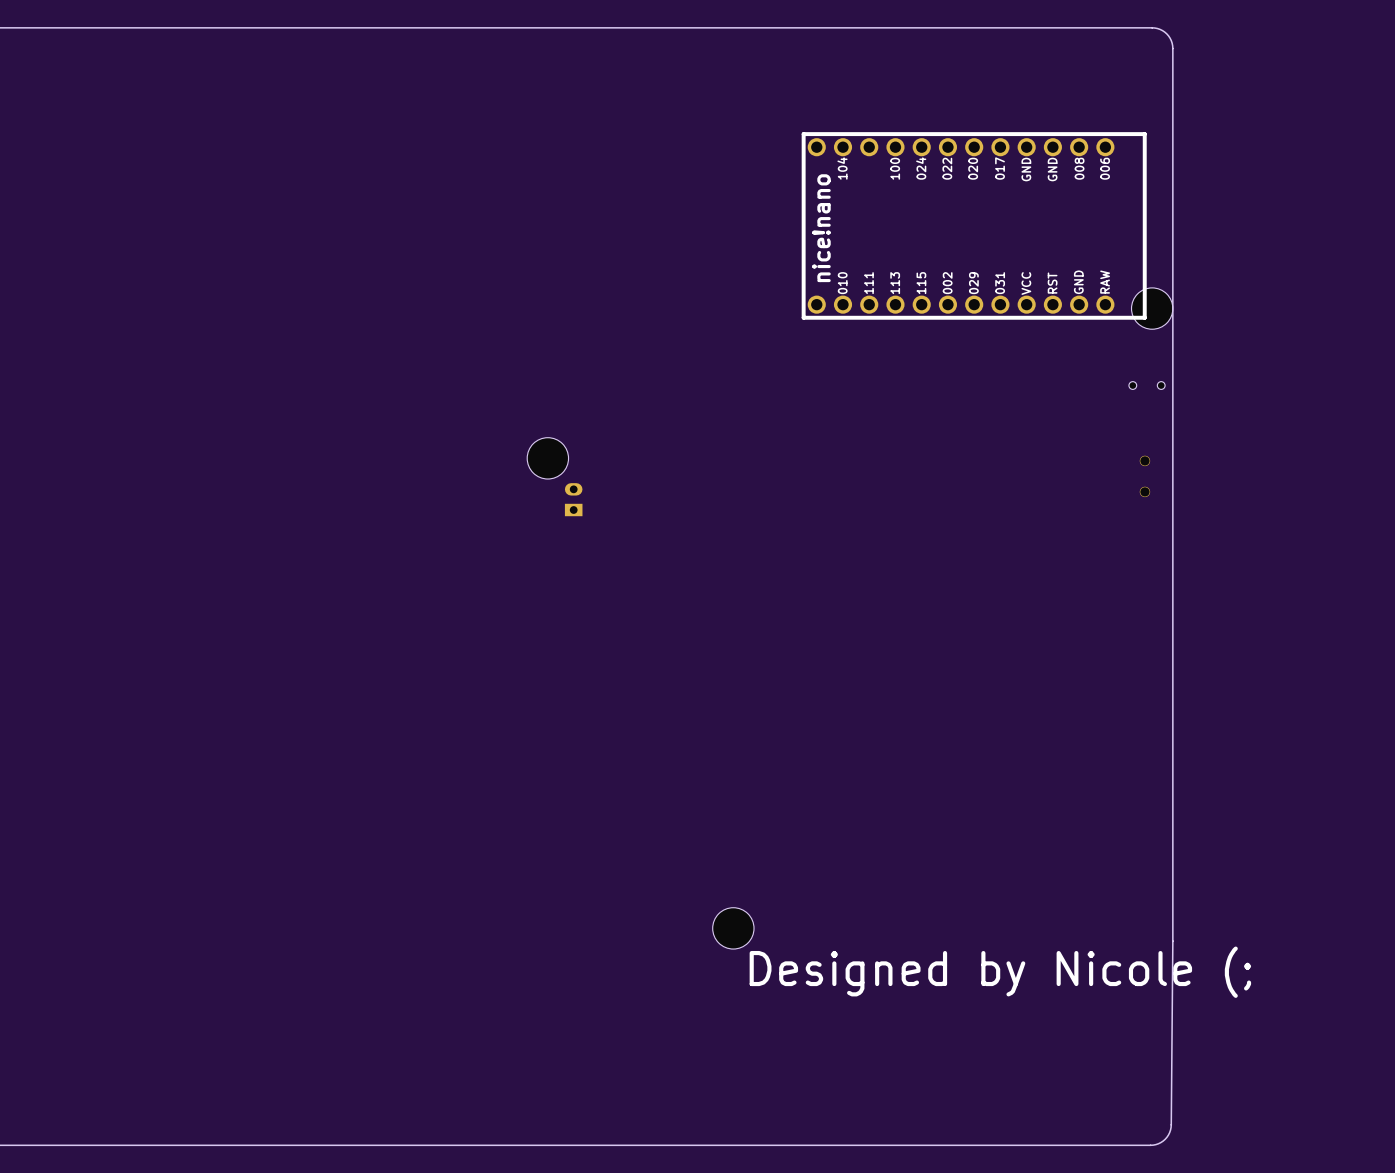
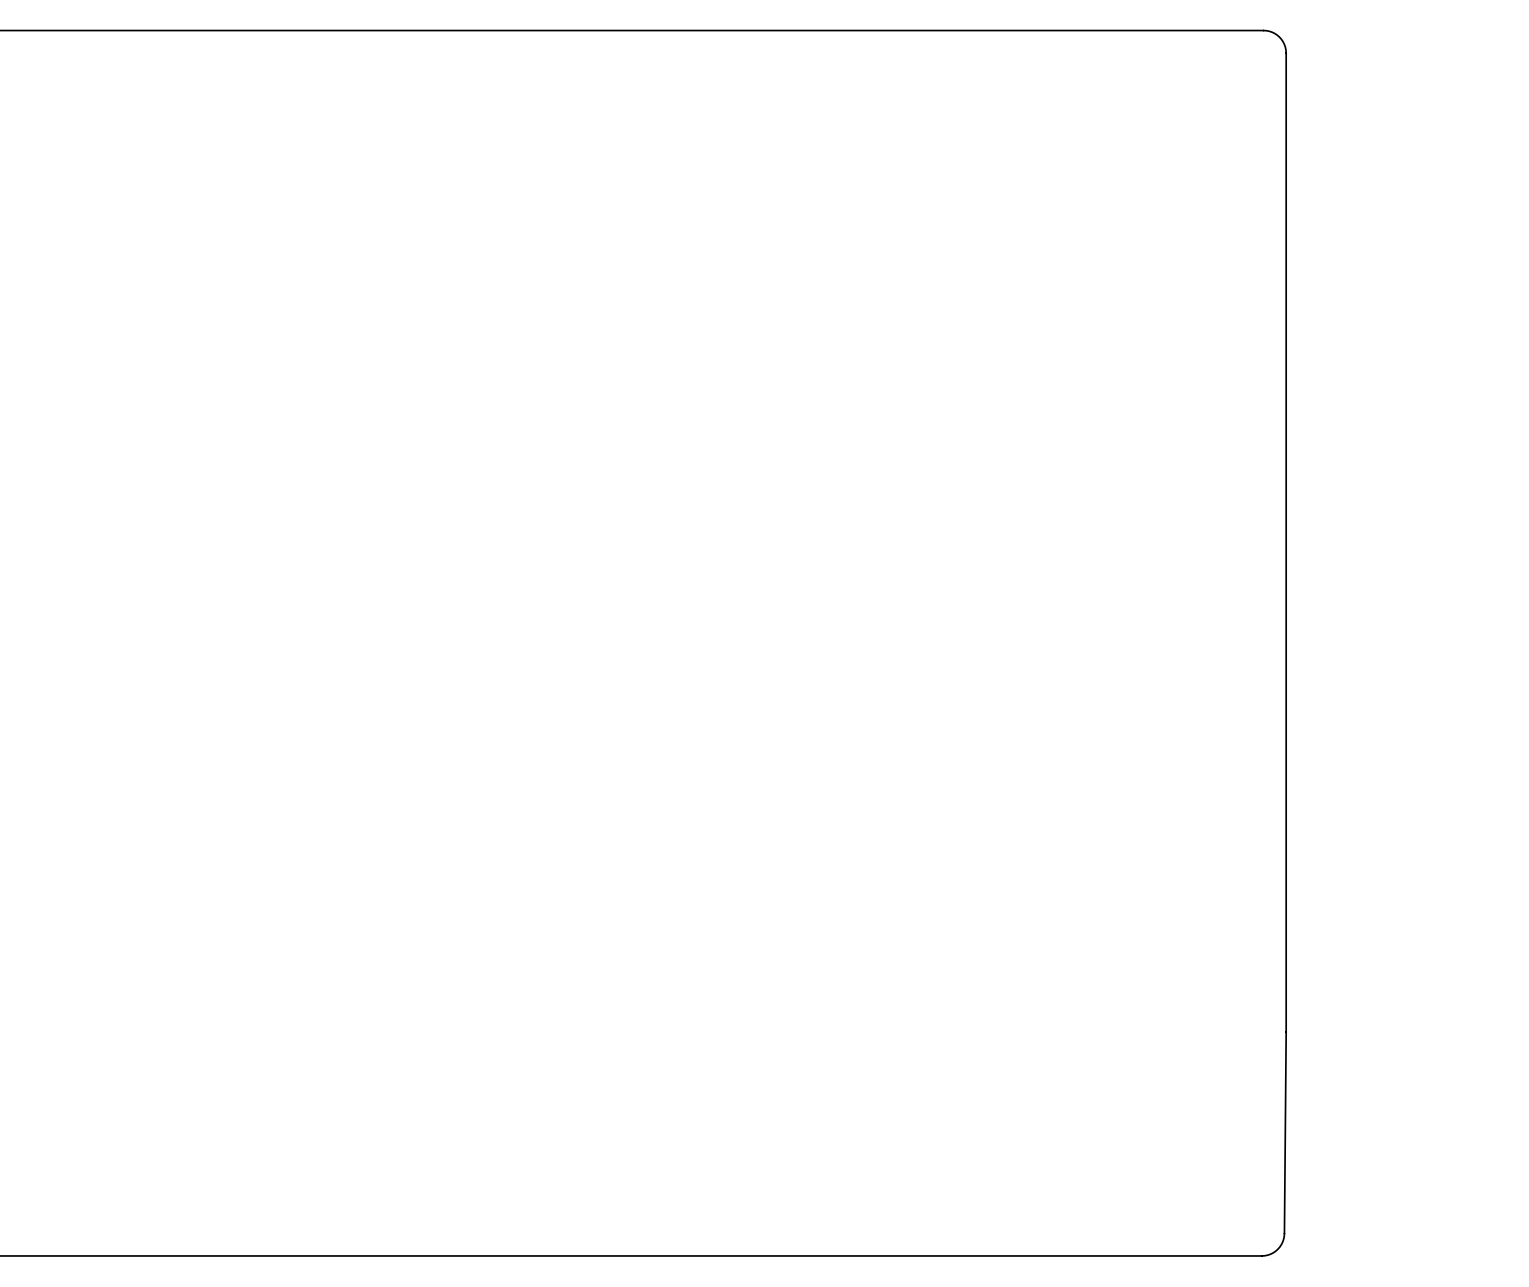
part: (974, 225) -> none
part: (1152, 308) -> none
part: (1147, 385) -> none
part: (547, 458) -> none
part: (1144, 476) -> none
part: (573, 499) -> none
part: (733, 928) -> none
text: Designed by Nicole (; (1000, 972) -> none

